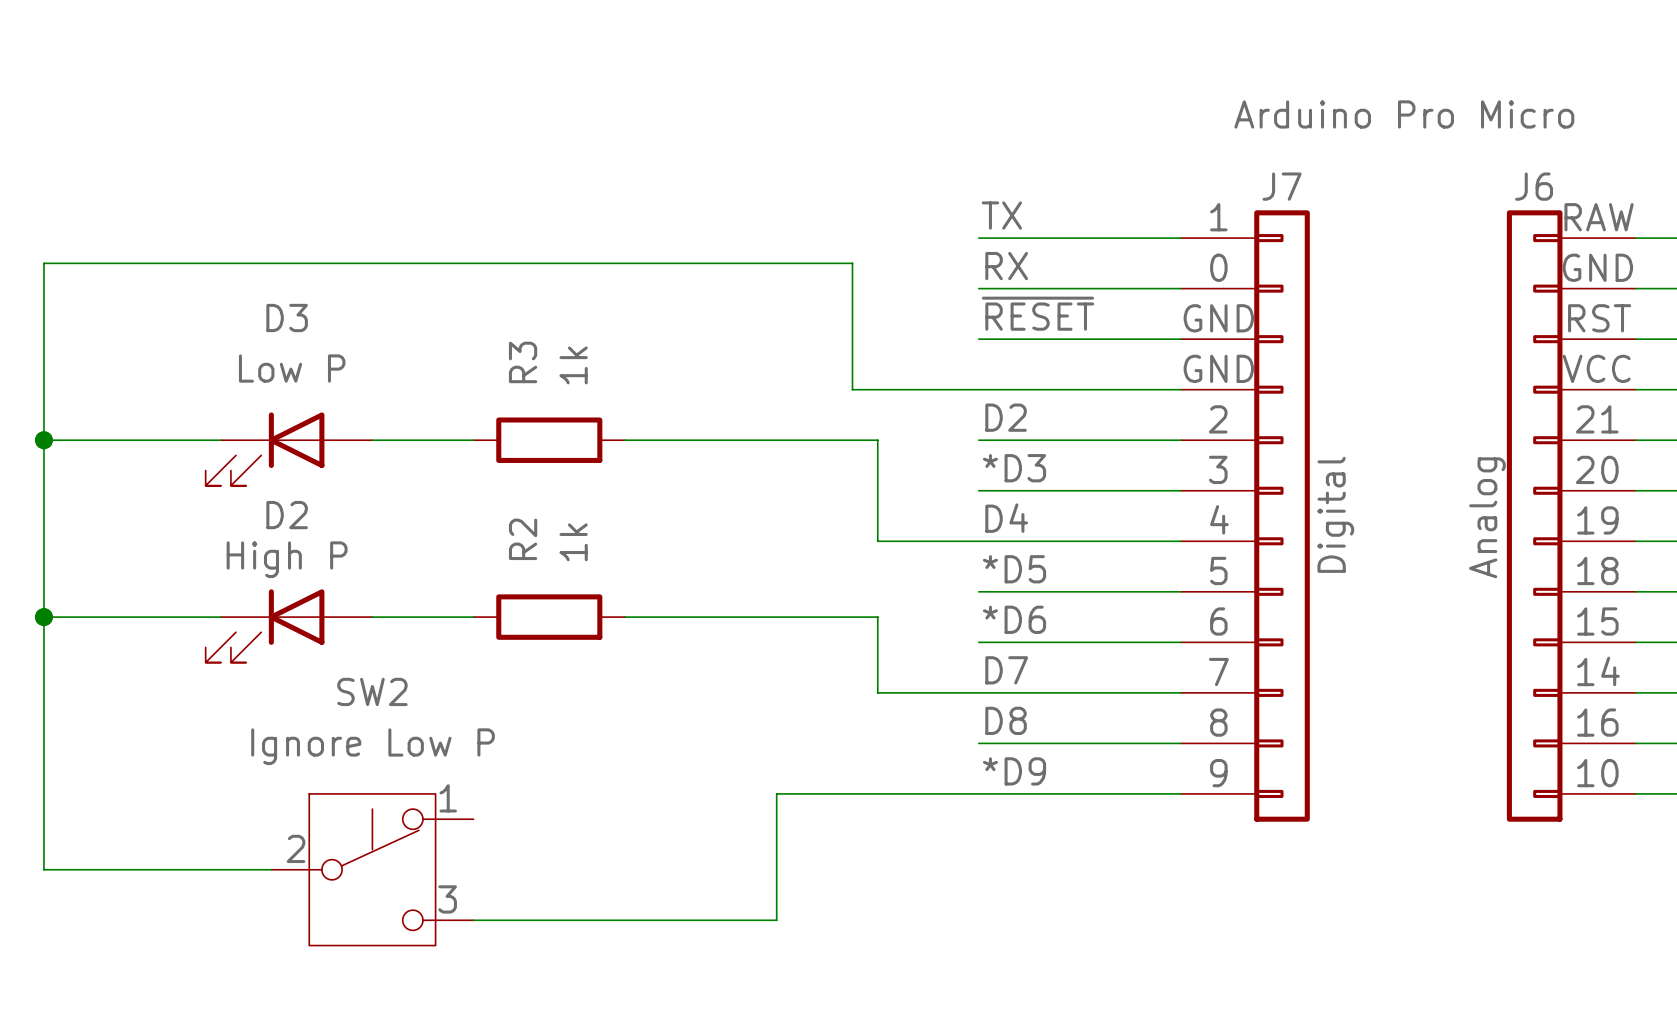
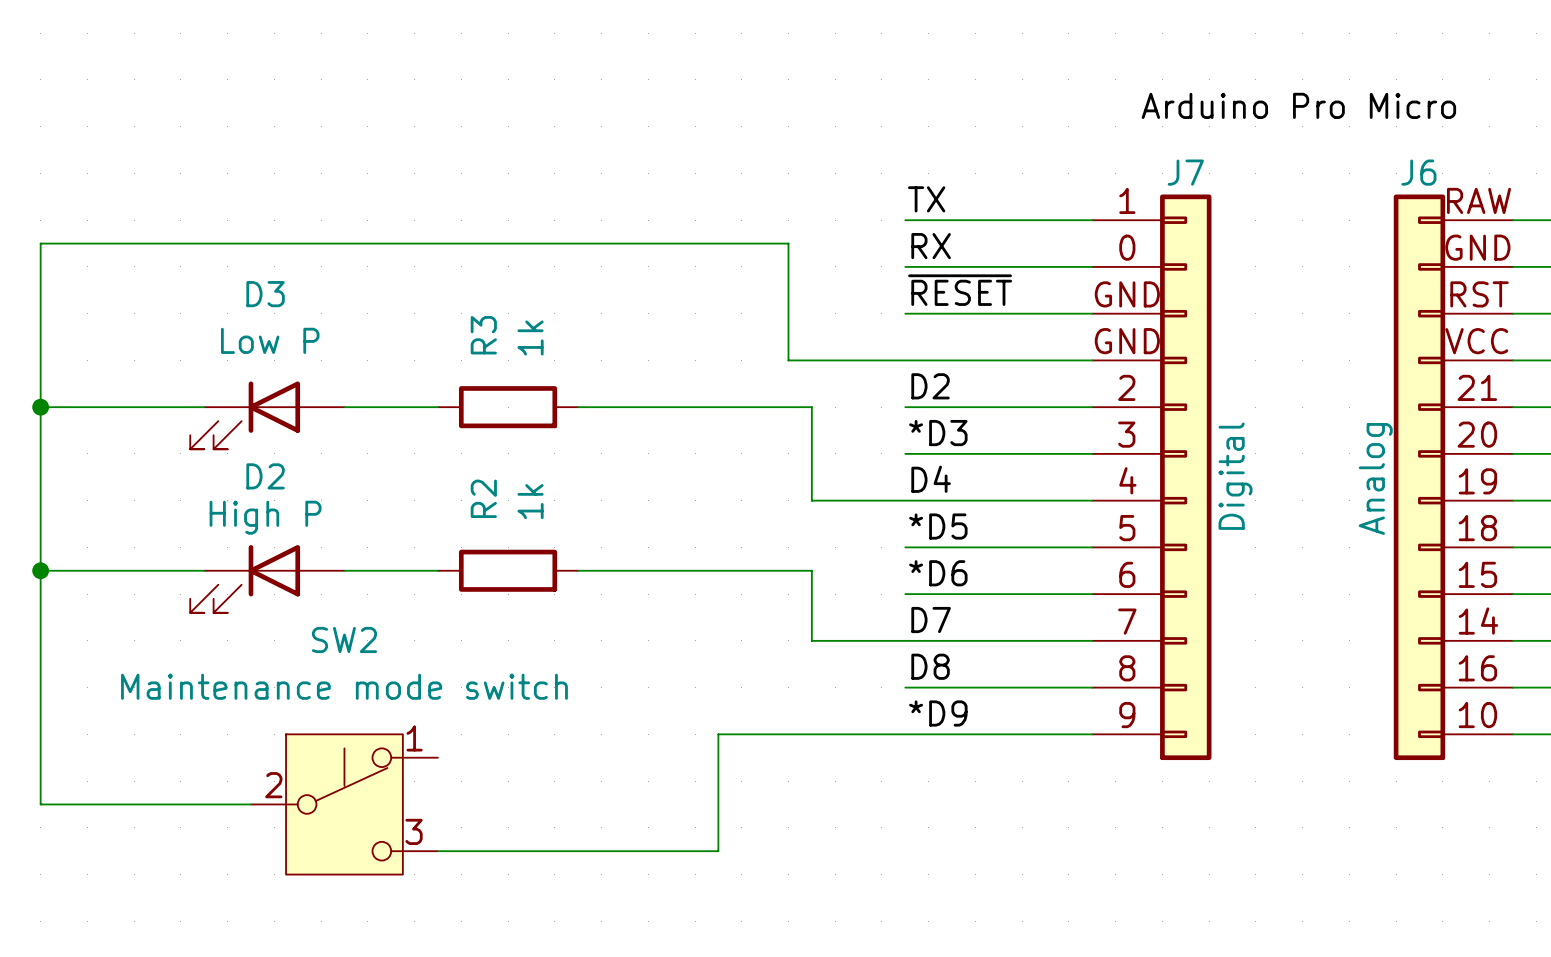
SW2 value: Ignore Low P (373, 746) -> Maintenance mode switch (344, 686)

